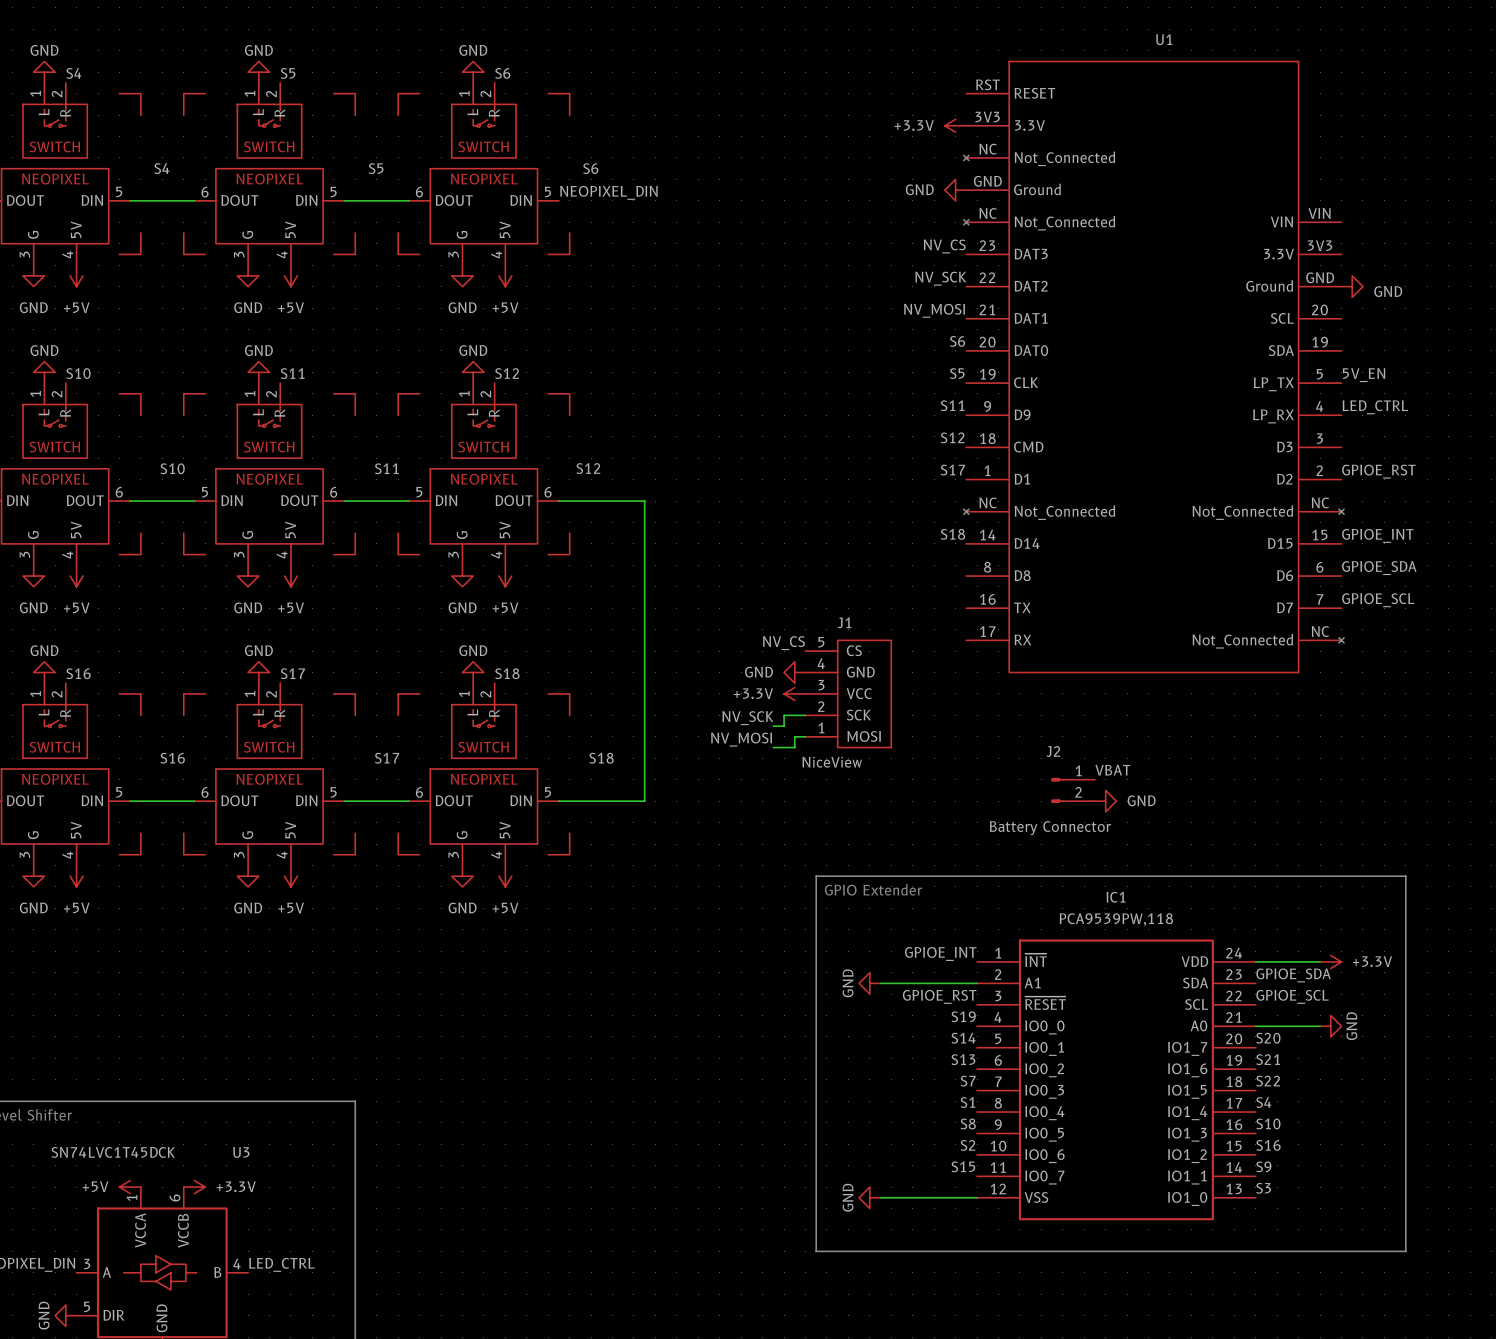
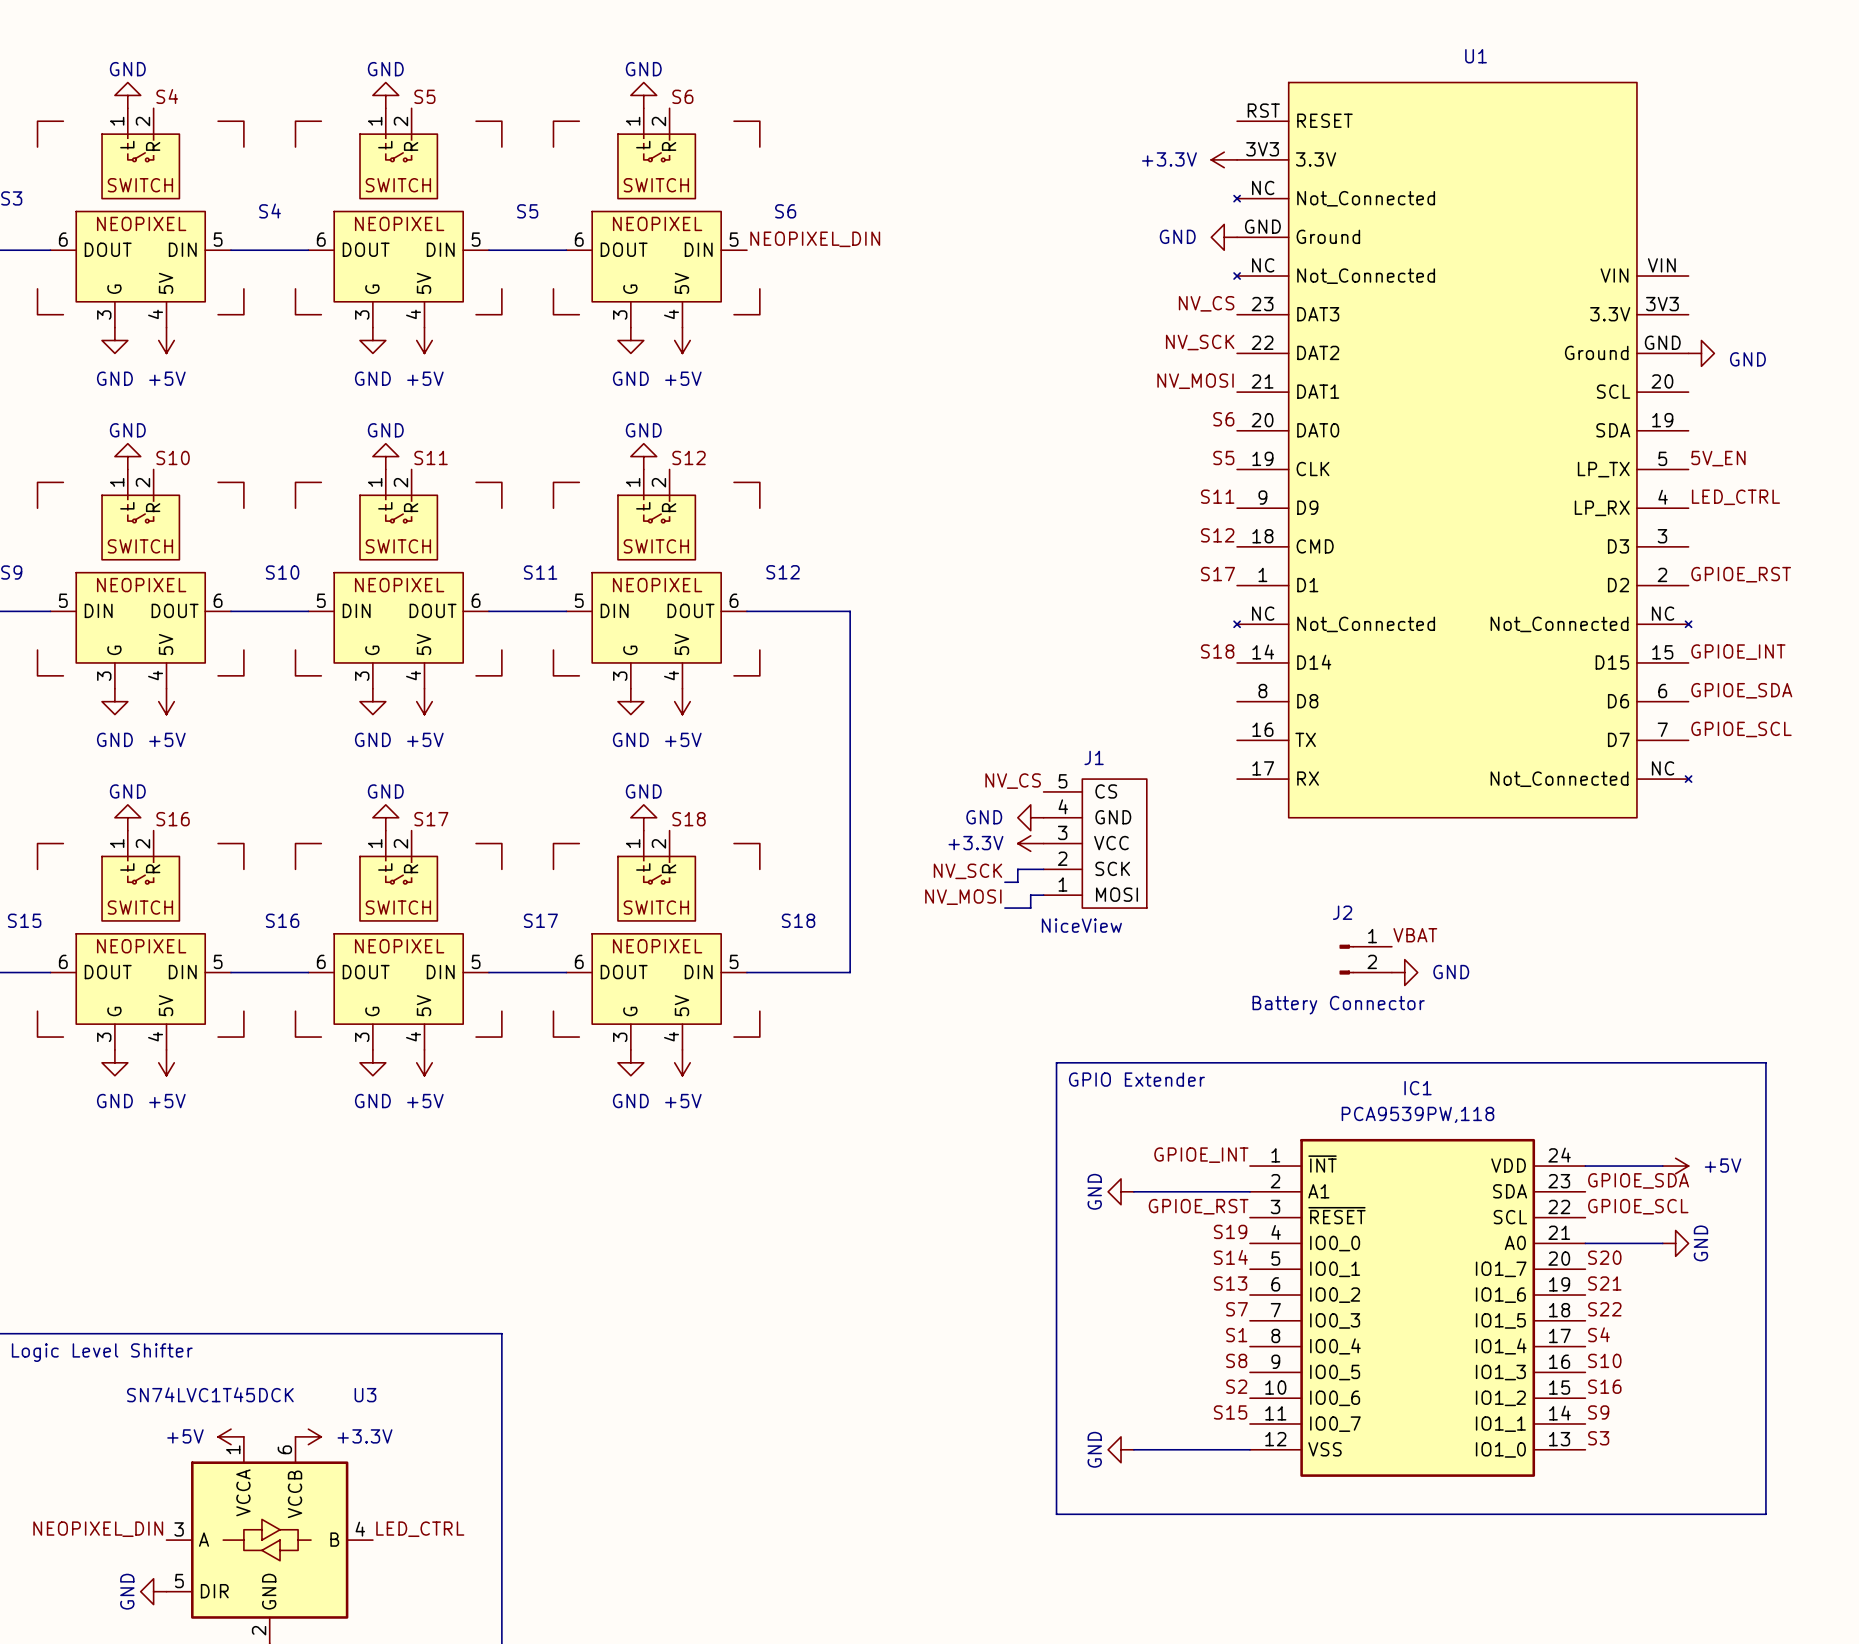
power symbol: +3.3V (1330, 961) -> +5V (1675, 1166)

